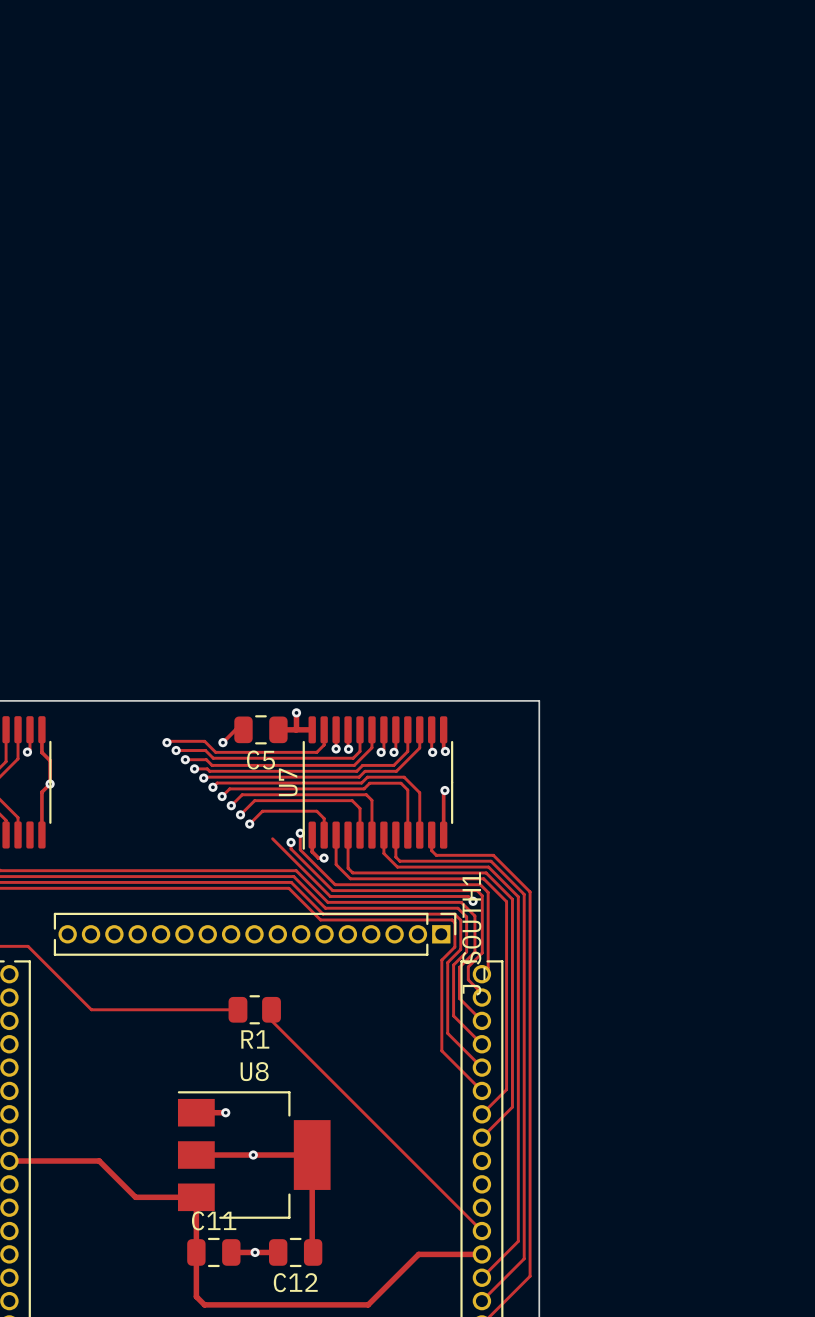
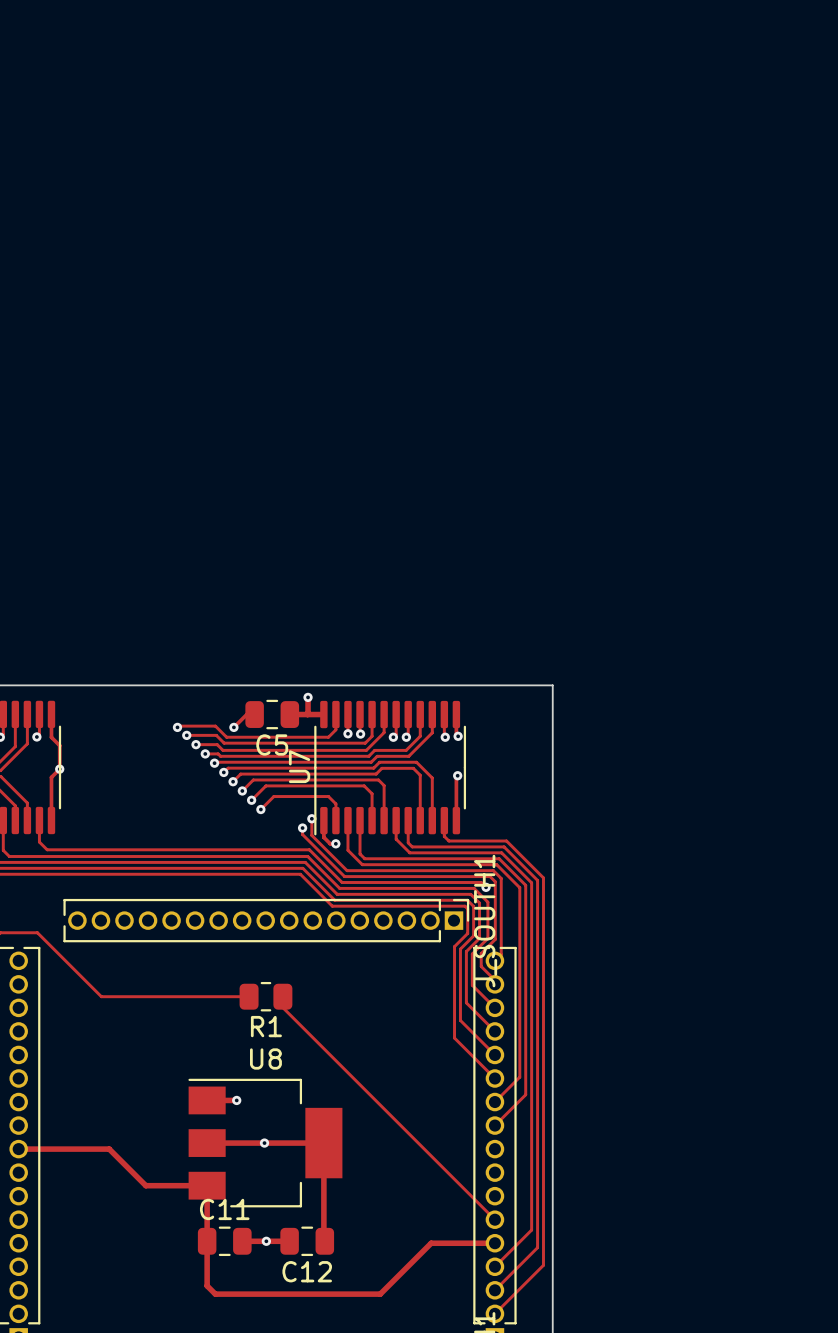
track: (272, 838) (297, 864) -> (39, 820) (39, 842) (47, 849) (309, 849)

